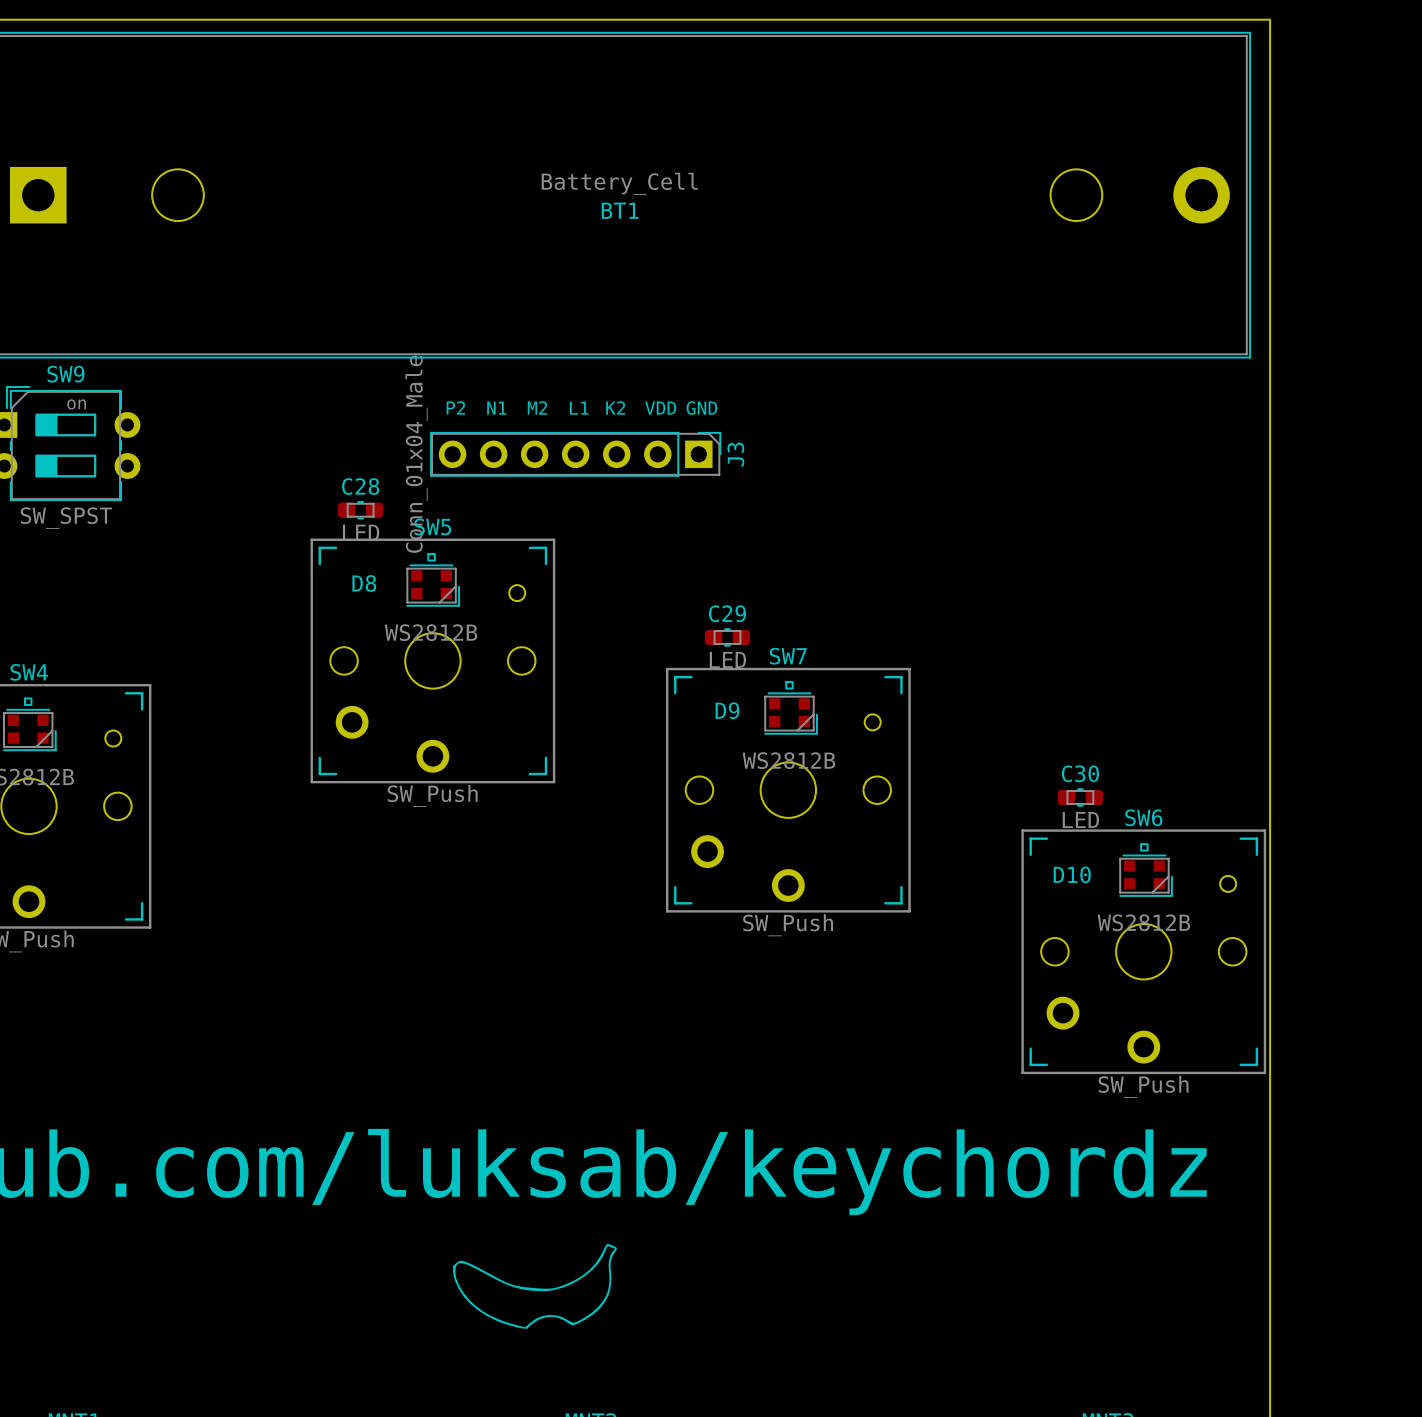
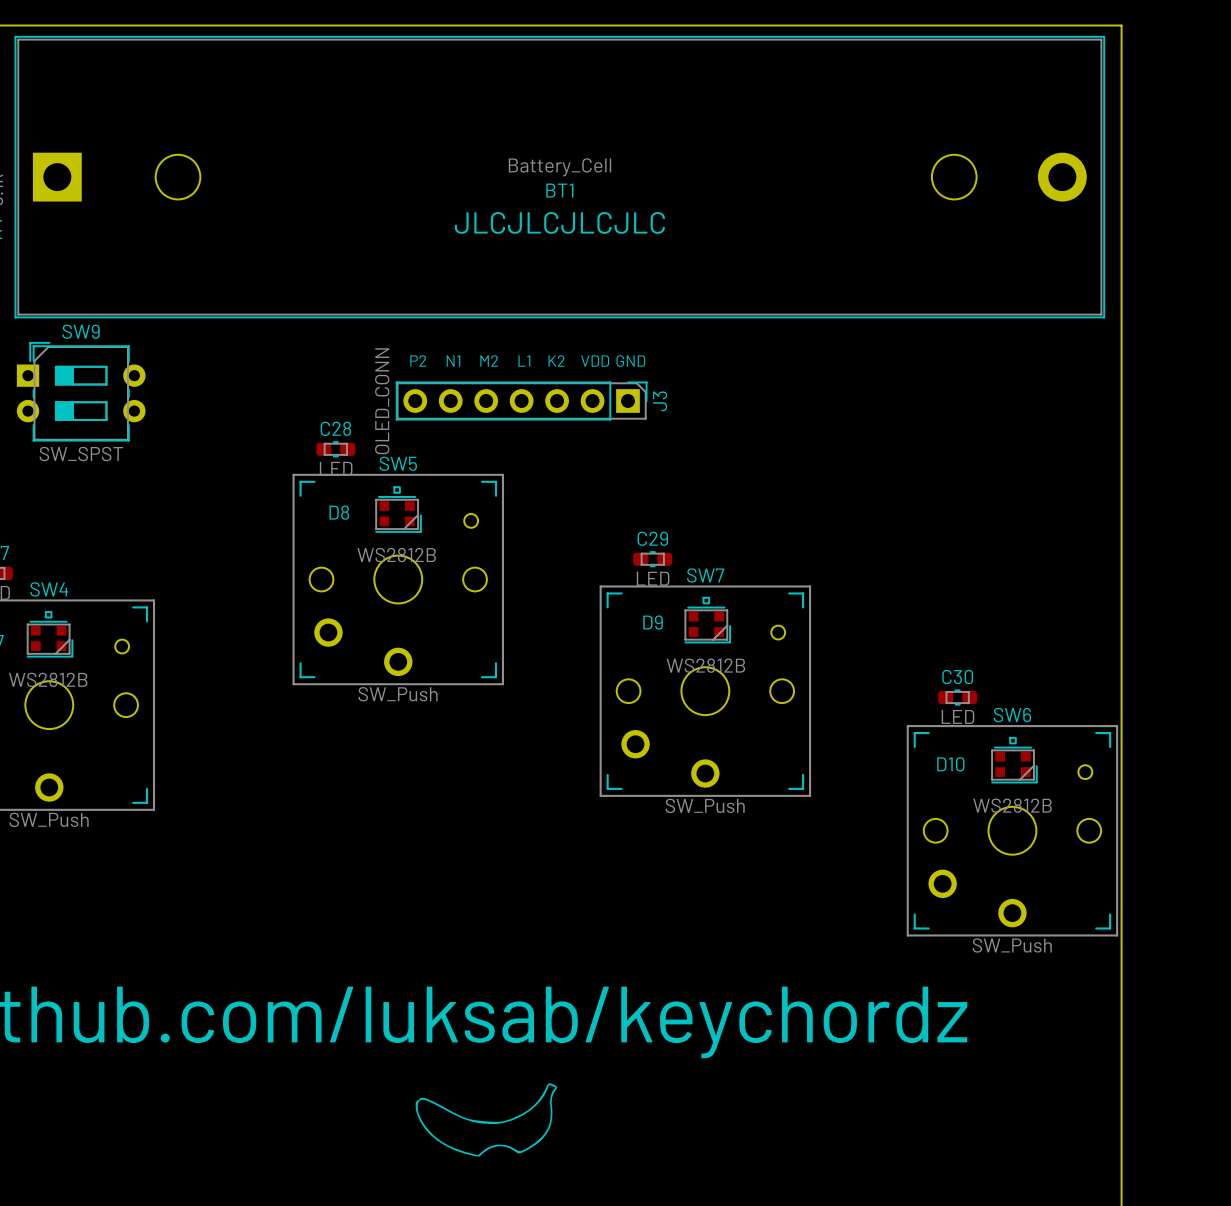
text: none -> JLCJLCJLCJLC (559, 222)
SW9 text: on (76, 404) -> none
J3 value: Conn_01x04_Male (416, 454) -> OLED_CONN (382, 401)

